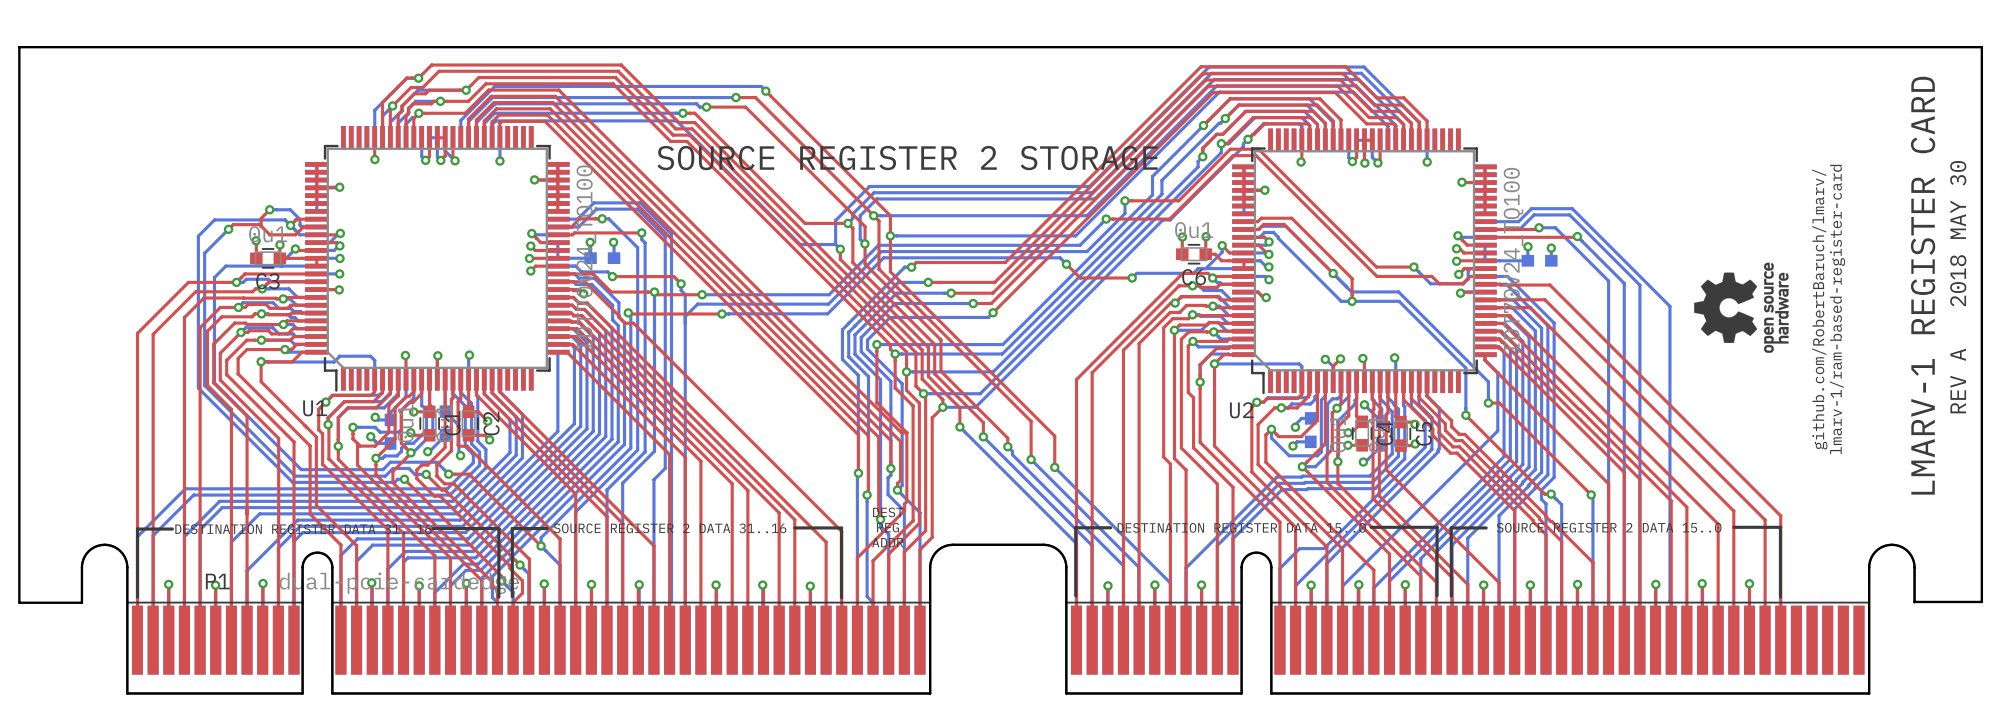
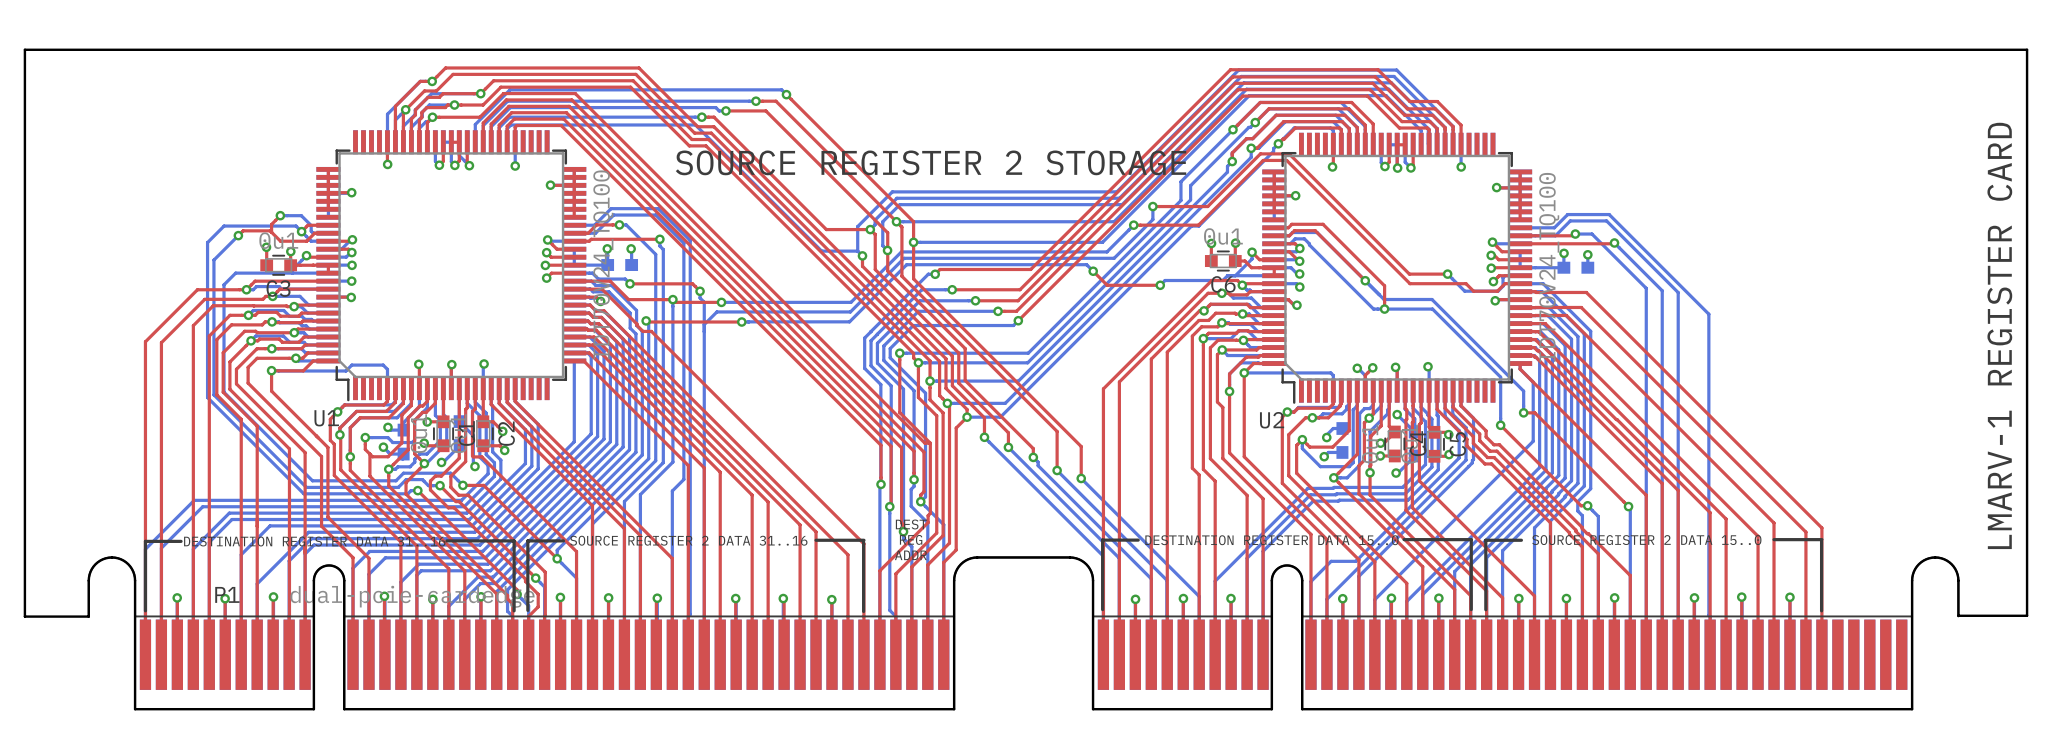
drawing: [1694, 262, 1789, 353] -> none
text position: LMARV-1 REGISTER CARD (1923, 285) -> LMARV-1 REGISTER CARD (1999, 335)
text: REV A 2018 MAY 30 (1958, 287) -> none
text: github.com/RobertBaruch/lmarv/ (1819, 309) -> none
text: lmarv-1/ram-based-register-card (1837, 309) -> none

